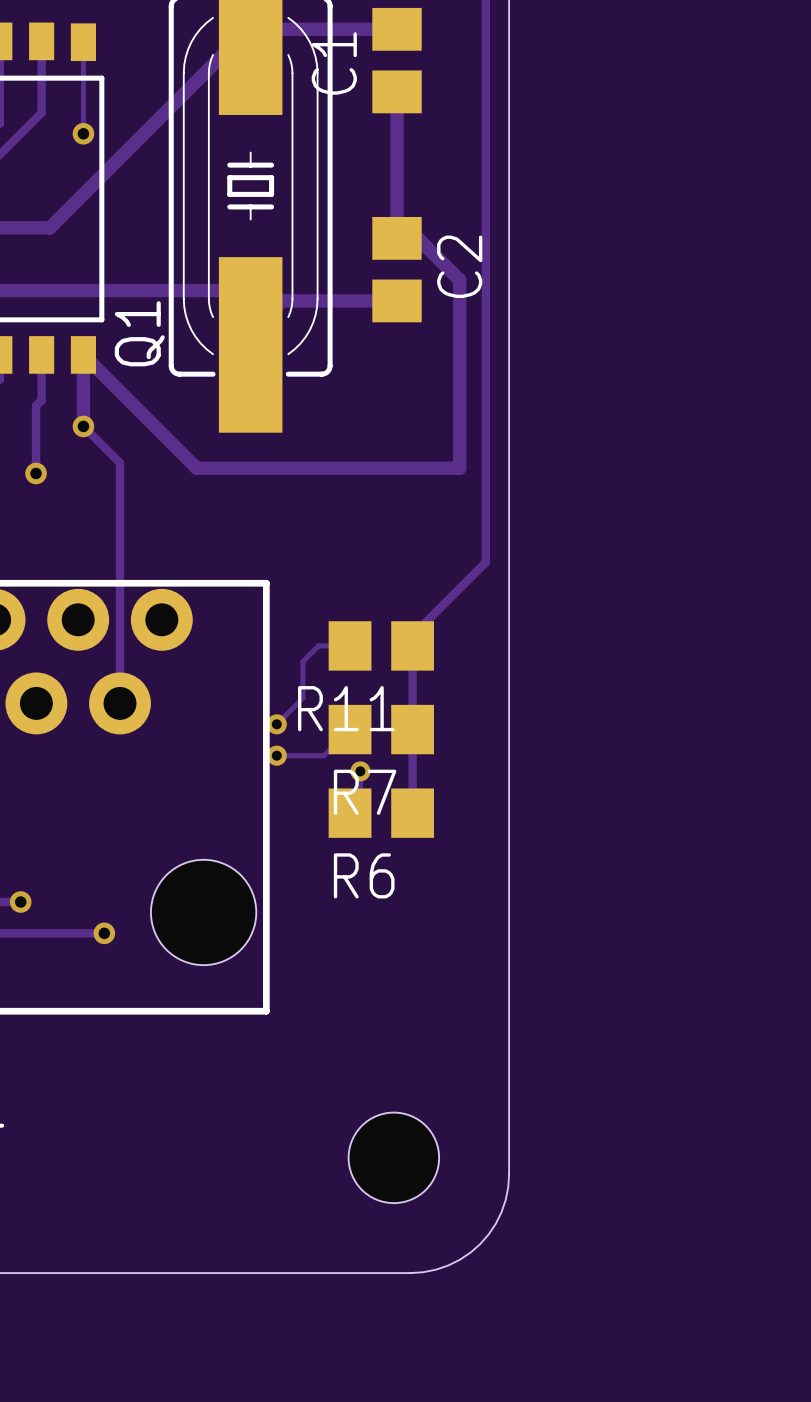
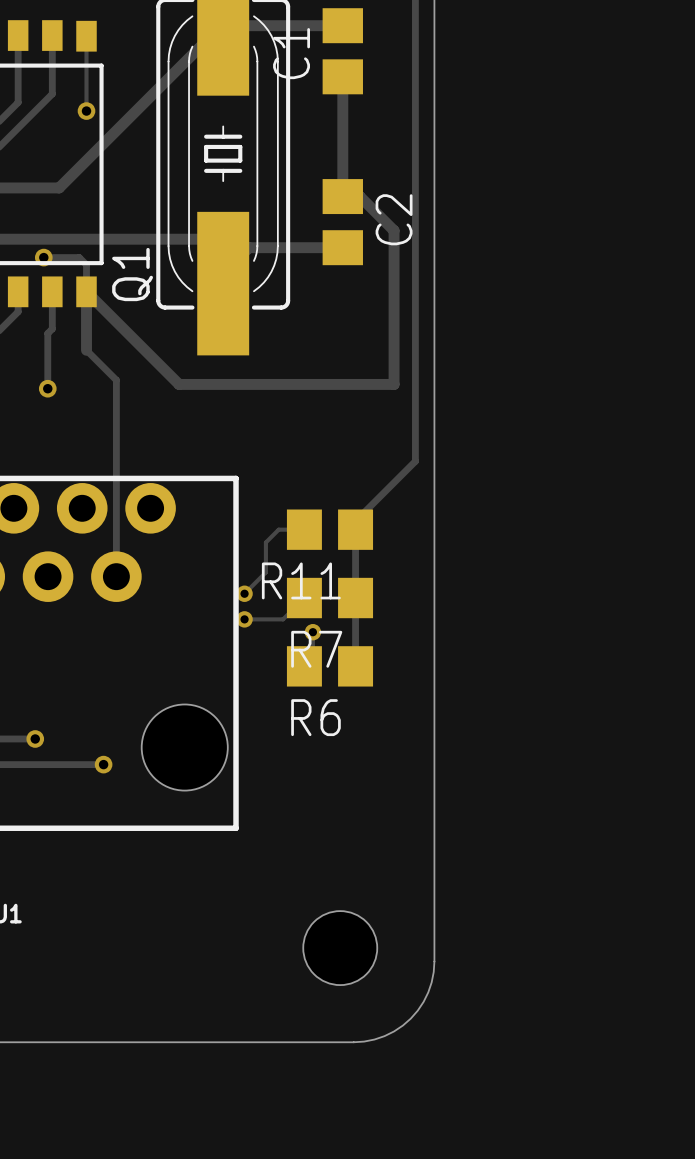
track: none -> (43, 257) (79, 257) (86, 264) (86, 291)
via position: (83, 426) -> (43, 257)

